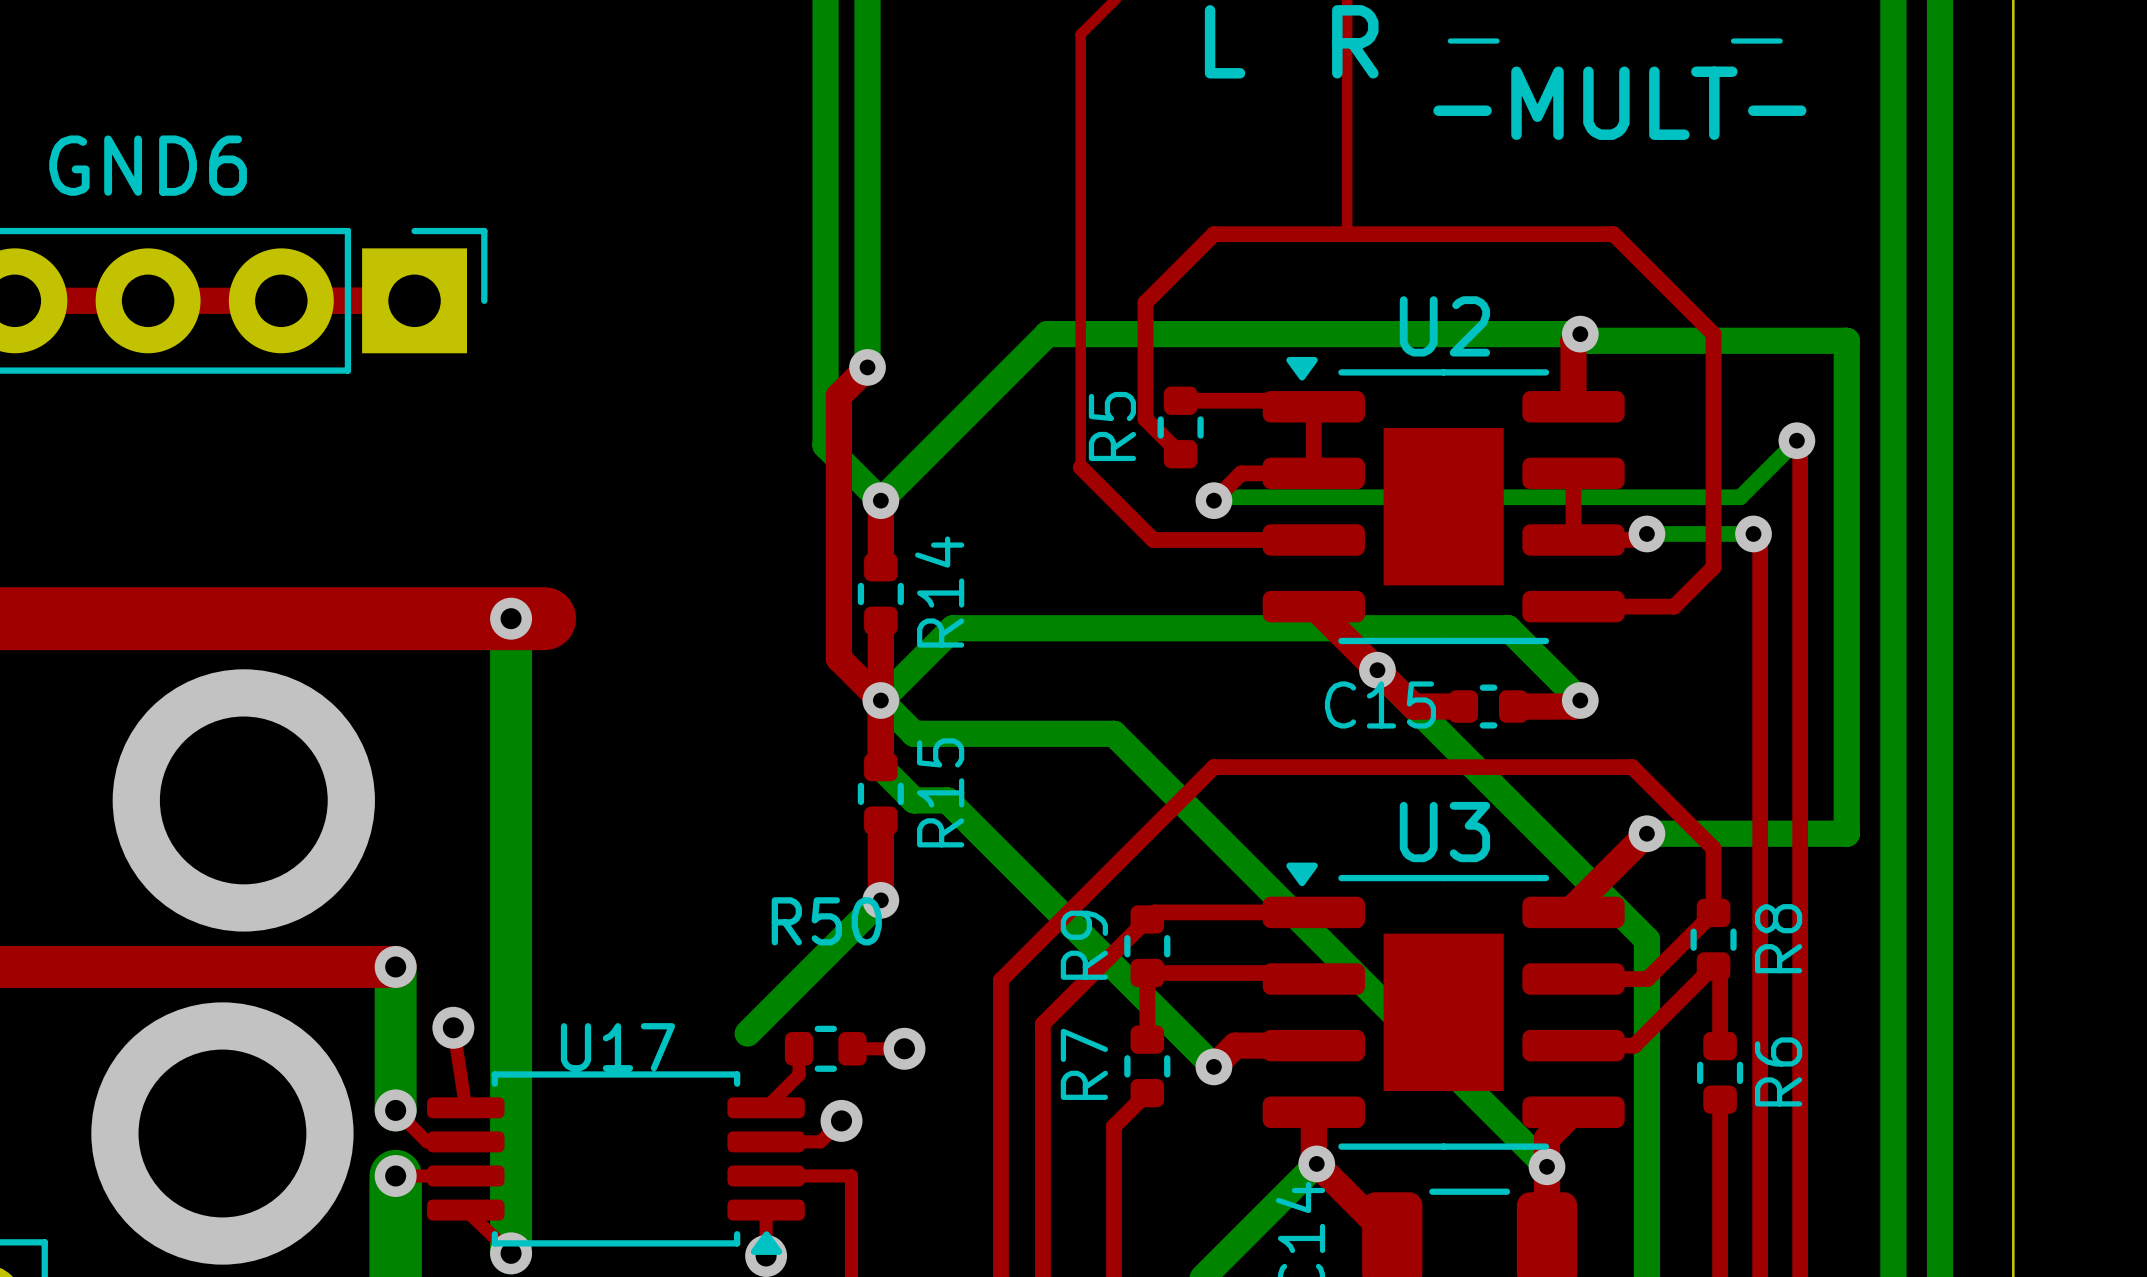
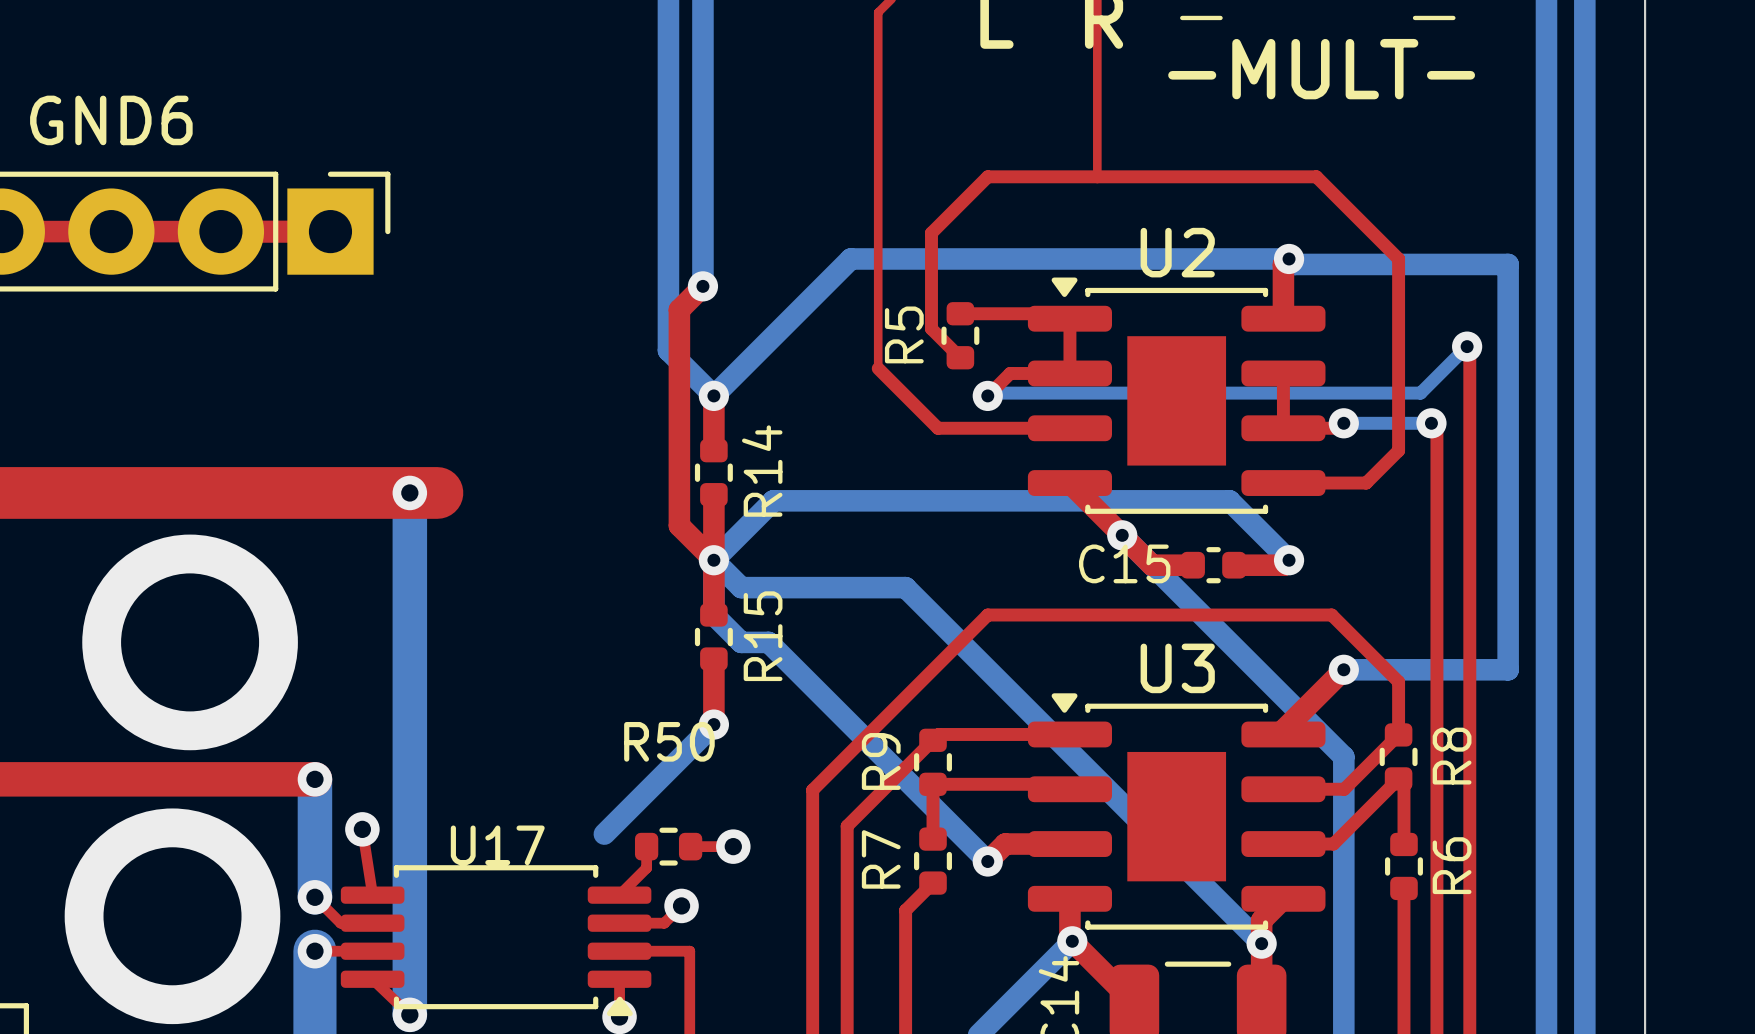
U2 footprint: [1262, 356, 1625, 645] -> [1027, 277, 1326, 514]
U3 footprint: [1262, 862, 1625, 1150] -> [1027, 693, 1326, 930]

